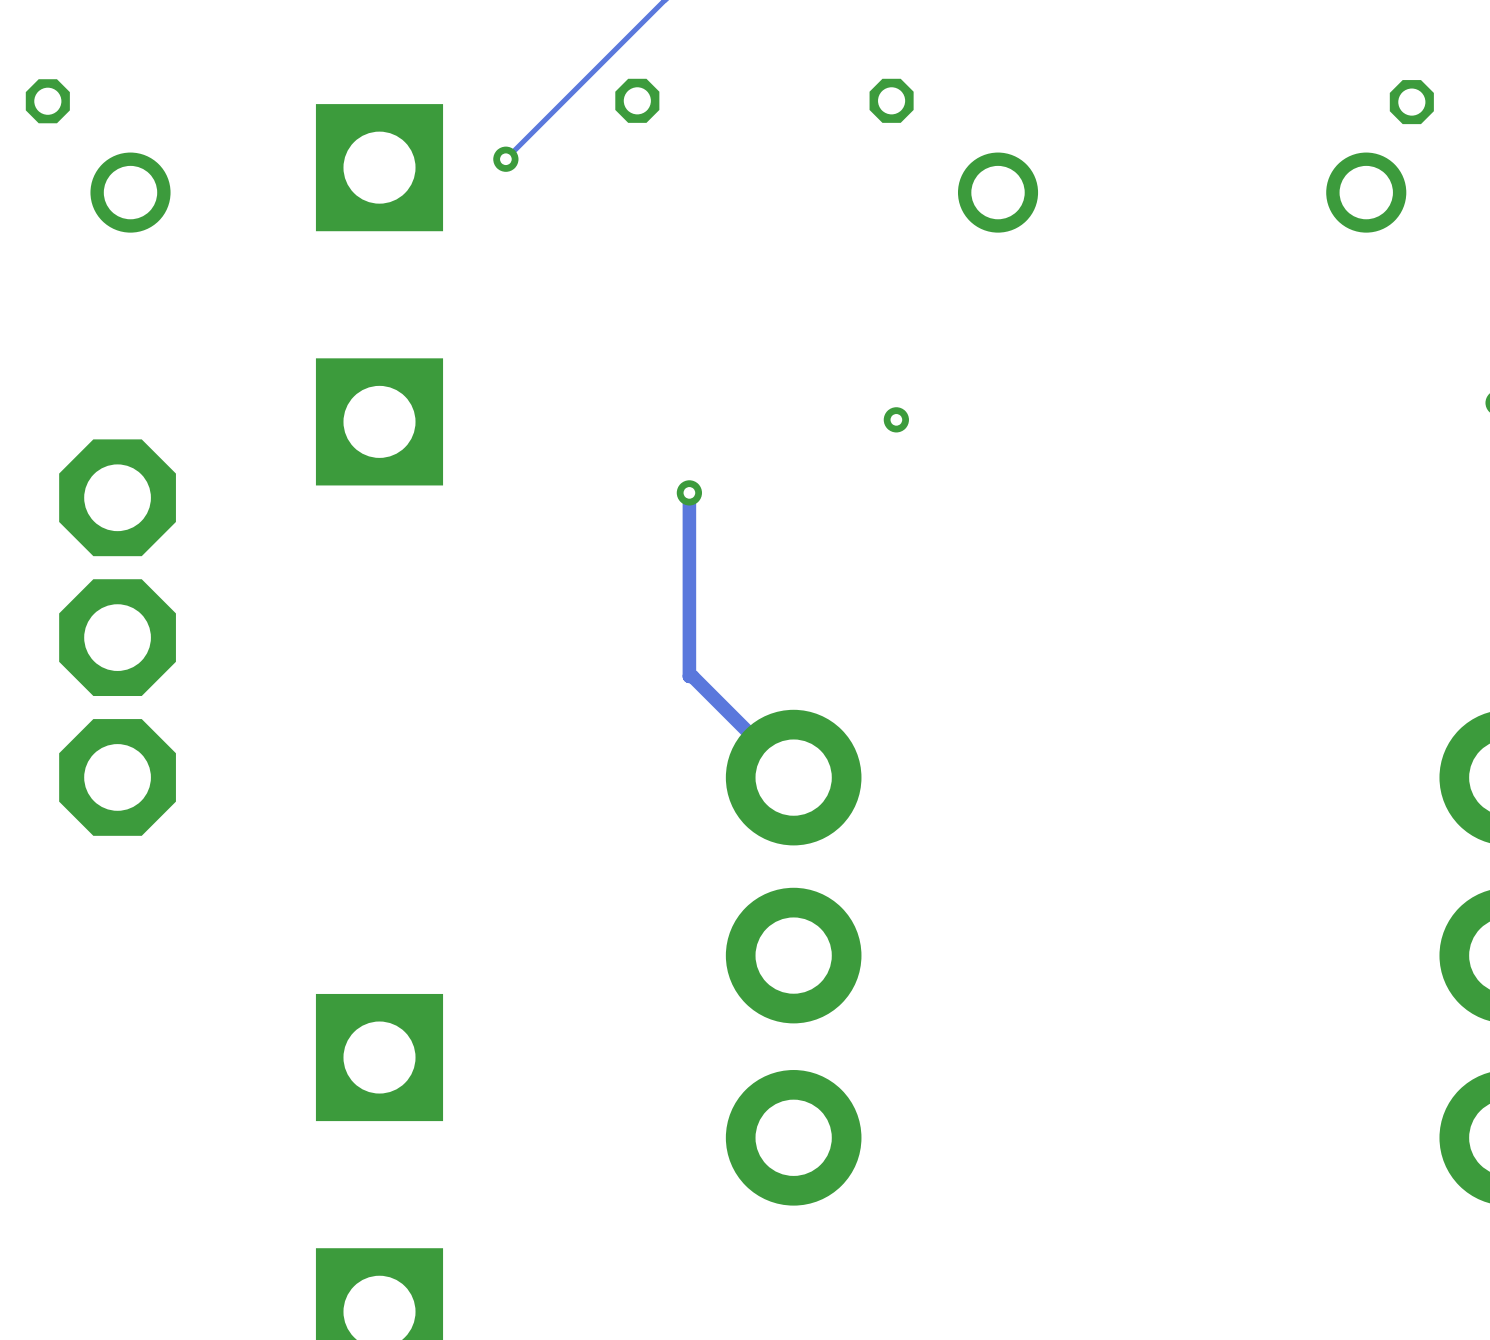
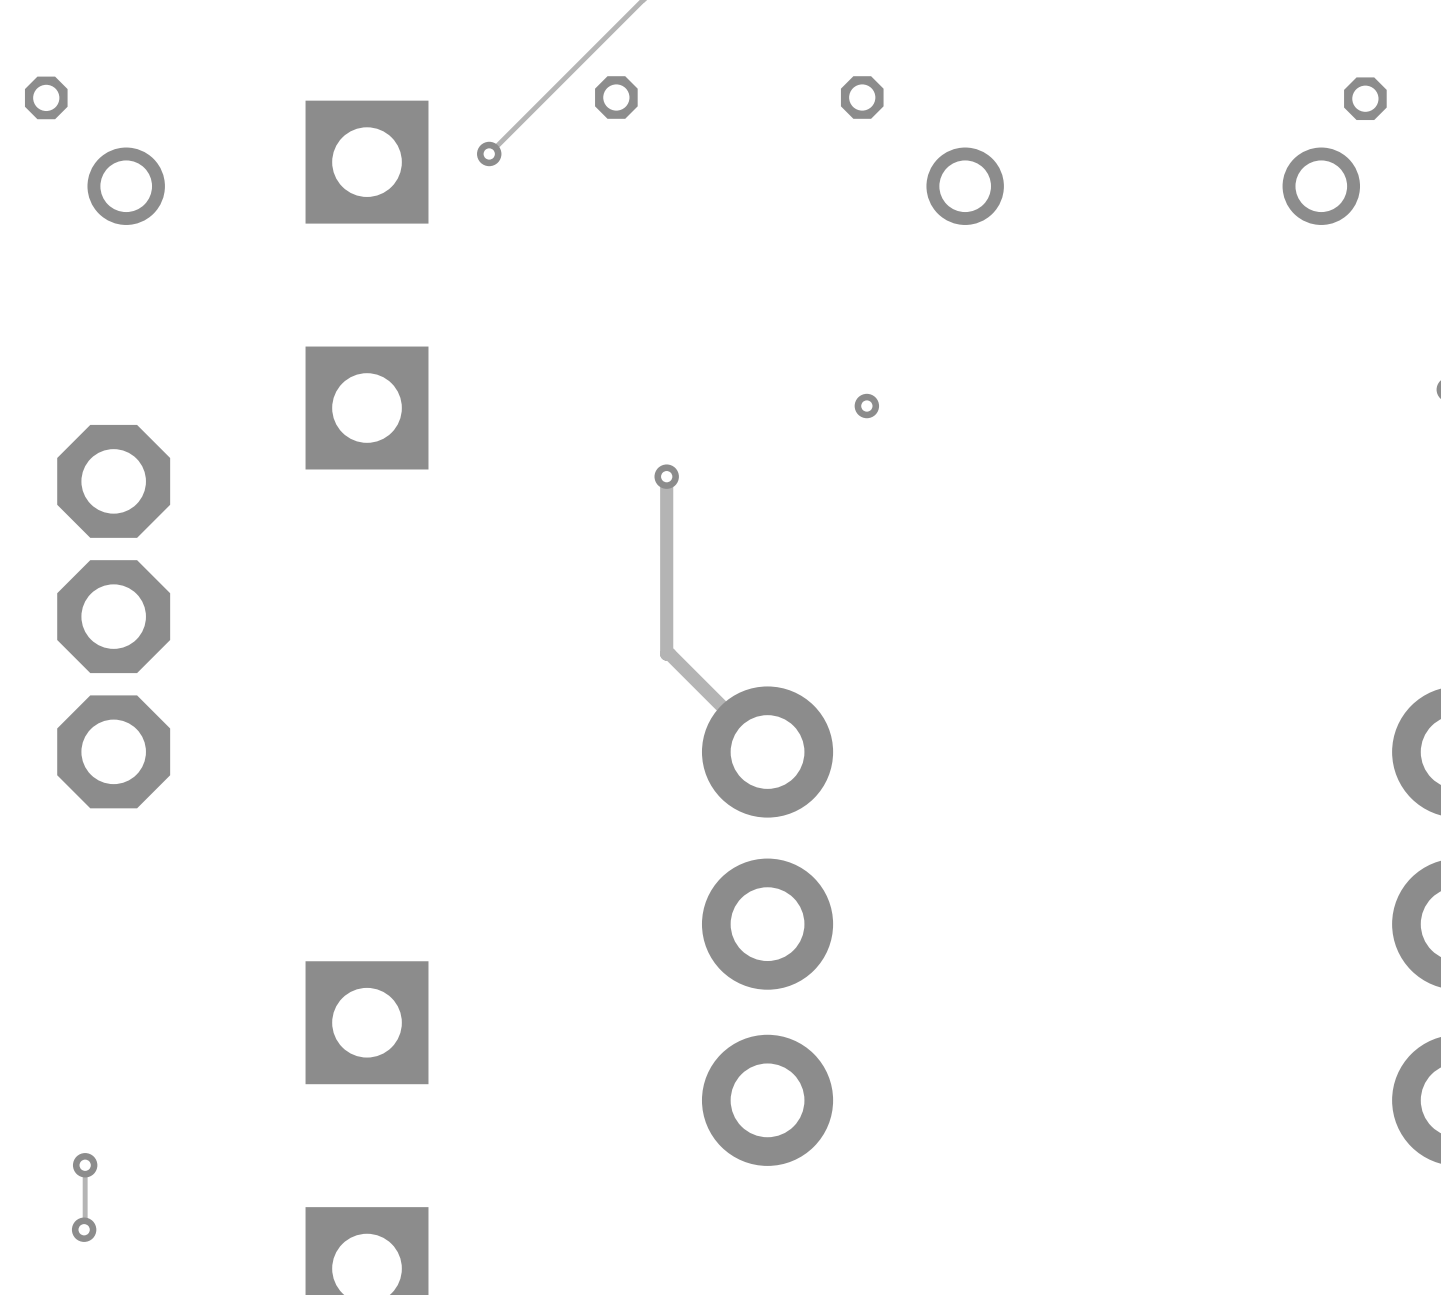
track: none -> (85, 1165) (84, 1229)
via: none -> (85, 1165)
via: none -> (84, 1229)

